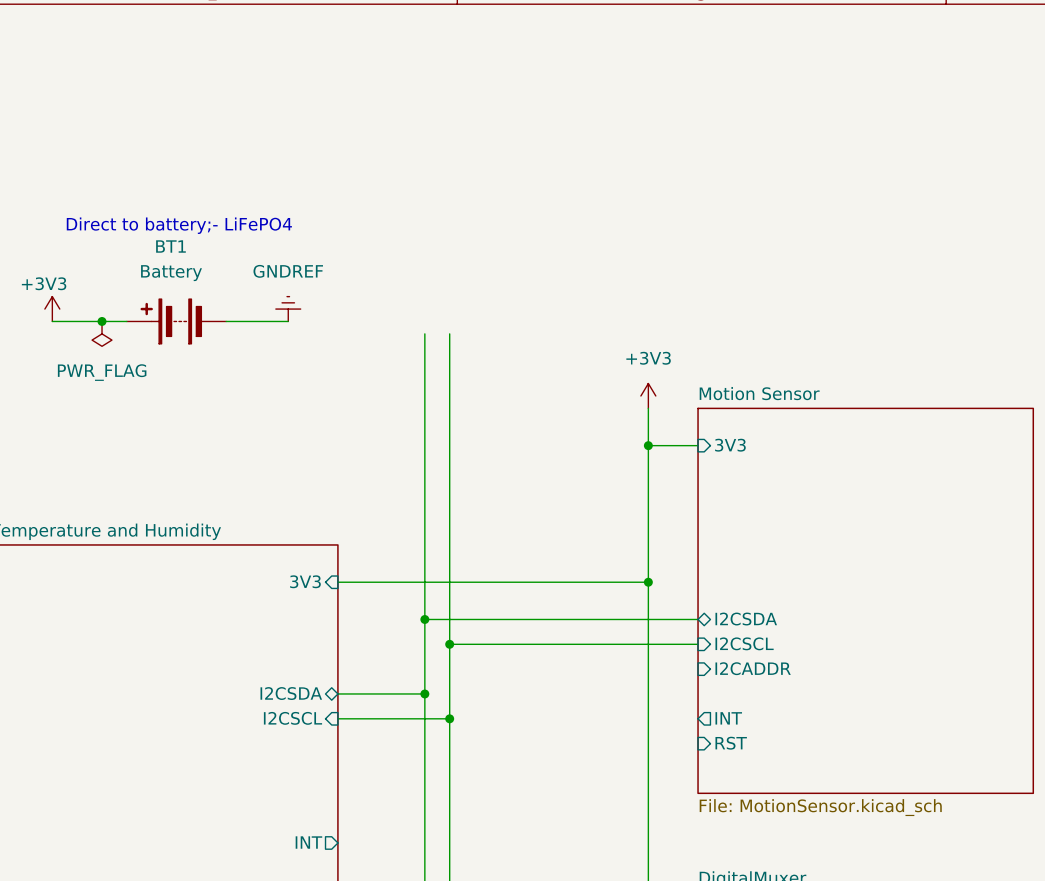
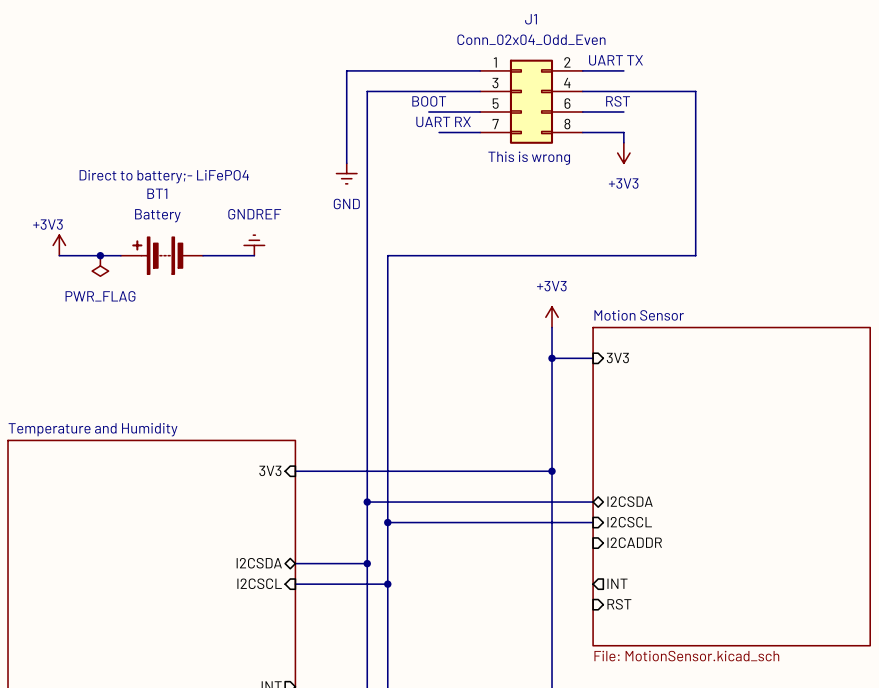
text: none -> UART TX (616, 60)
wire: none -> (480, 70) (346, 70) (346, 163)
wire: none -> (582, 70) (623, 70)
wire: none -> (480, 91) (367, 91) (367, 265)
wire: none -> (582, 91) (695, 91) (695, 255) (387, 255) (387, 265)
text: none -> BOOT (429, 101)
text: none -> RST (618, 101)
J1: none -> Conn_02x04_Odd_Even (531, 101)
wire: none -> (428, 111) (480, 111)
wire: none -> (582, 111) (623, 111)
text: none -> UART RX (443, 121)
wire: none -> (439, 132) (480, 132)
wire: none -> (582, 132) (623, 132) (623, 142)
power symbol: none -> +3V3 (623, 153)
text: none -> This is wrong (529, 158)
power symbol: none -> GND (346, 173)

